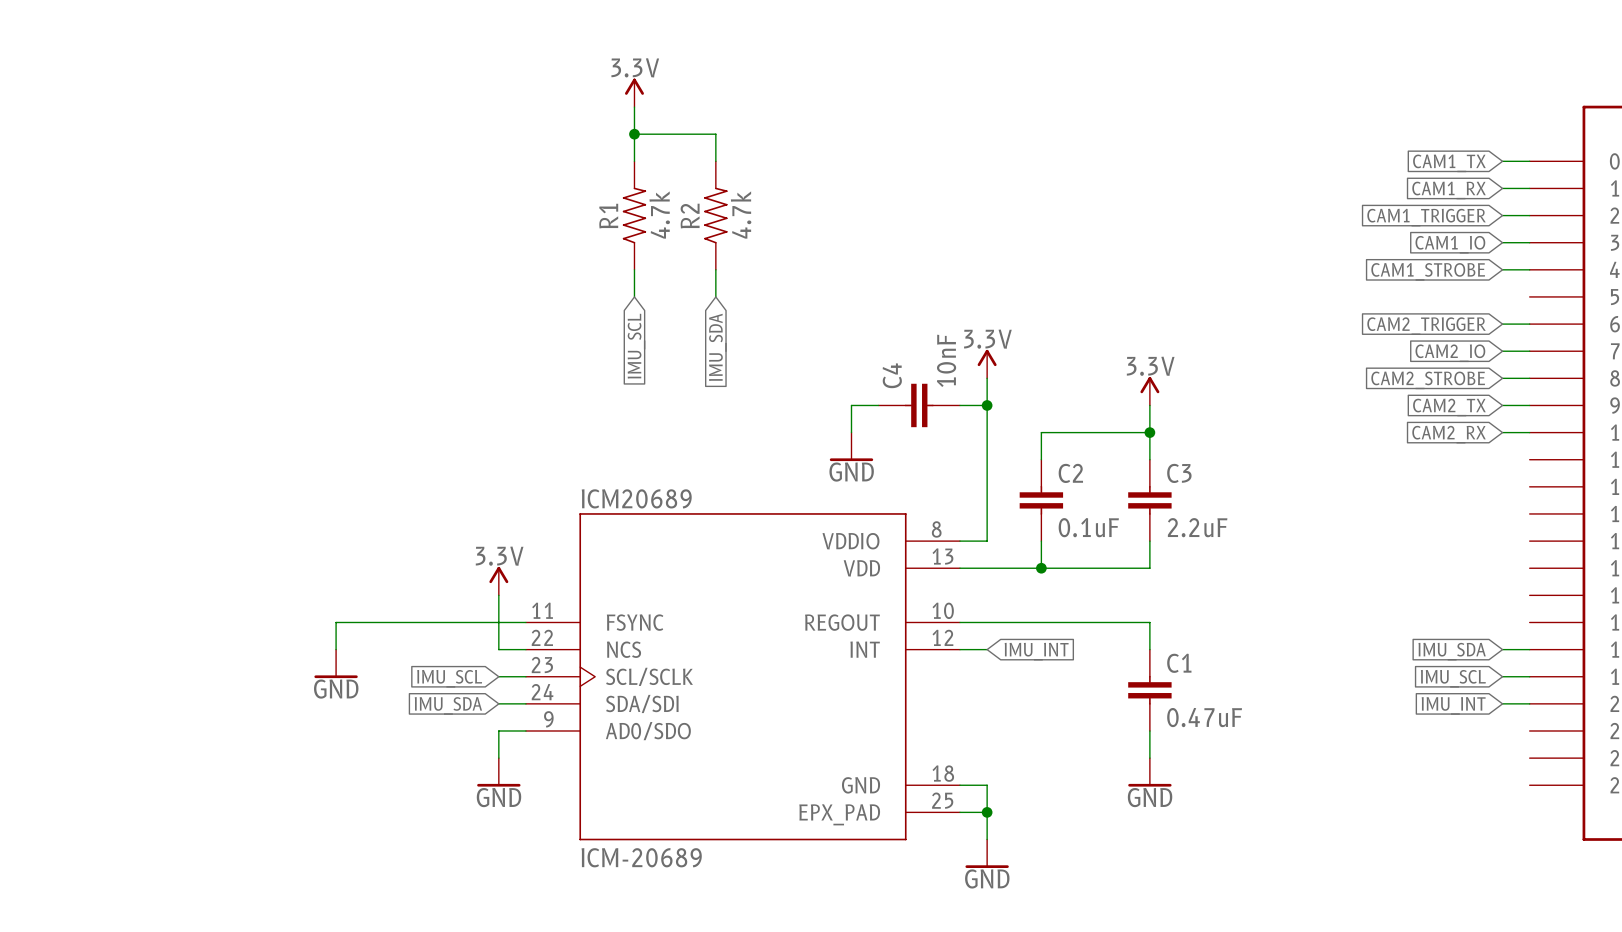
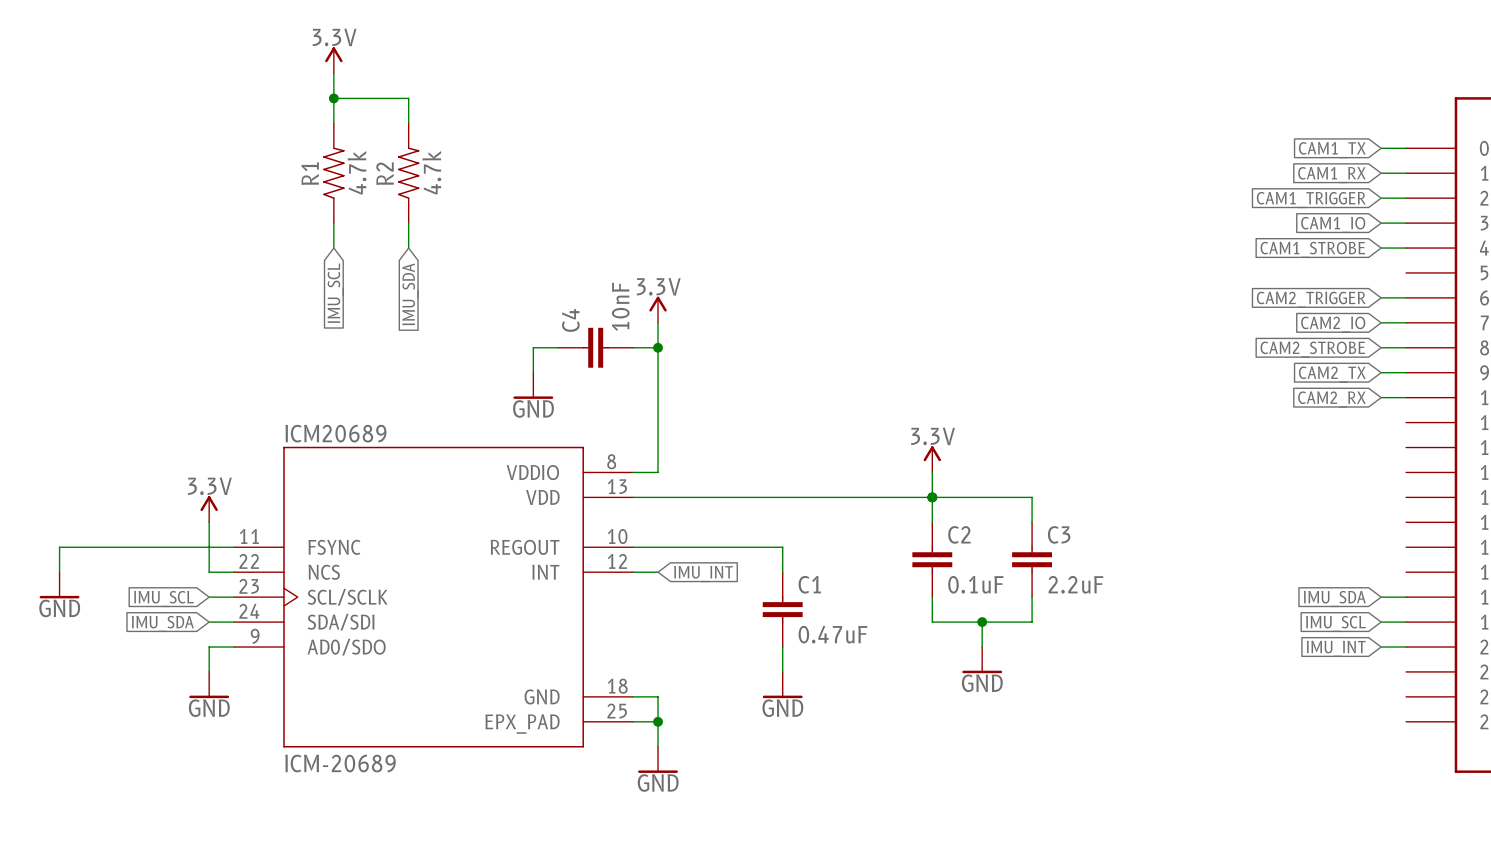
power symbol: none -> 3.3V (333, 60)
wire: none -> (333, 73) (333, 123)
power symbol: 3.3V (634, 92) -> none
wire: none -> (333, 98) (408, 98) (408, 123)
junction: none -> (333, 98)
wire: (634, 107) (634, 161) -> none
wire: (634, 134) (715, 134) (715, 161) -> none
junction: (634, 134) -> none
R1 position: (634, 215) -> (333, 173)
R2 position: (715, 215) -> (408, 173)
wire: none -> (333, 223) (333, 248)
wire: (634, 269) (634, 296) -> (408, 223) (408, 248)
wire: (715, 269) (715, 296) -> none
global label: none -> IMU_SCL (335, 293)
global label: none -> IMU_SDA (410, 294)
power symbol: none -> 3.3V (658, 309)
global label: IMU_SCL (636, 346) -> none
global label: IMU_SDA (717, 347) -> none
wire: none -> (658, 322) (658, 472) (633, 472)
power symbol: 3.3V (987, 364) -> none
wire: none -> (558, 347) (533, 347) (533, 372)
wire: none -> (633, 347) (658, 347)
junction: none -> (658, 347)
wire: (987, 378) (987, 541) -> (1032, 522) (1032, 497) (907, 497)
power symbol: 3.3V (1149, 391) -> none
wire: (878, 405) (851, 405) (851, 432) -> none
C4 position: (919, 405) -> (595, 347)
wire: (960, 405) (987, 405) -> none
junction: (987, 405) -> none
wire: (1149, 405) (1149, 459) -> (932, 472) (932, 522)
power symbol: none -> GND (533, 385)
wire: (1149, 432) (1041, 432) (1041, 459) -> none
junction: (1149, 432) -> none
power symbol: GND (851, 446) -> none
power symbol: none -> 3.3V (932, 459)
C2 position: (1041, 500) -> (932, 559)
C3 position: (1149, 500) -> (1032, 559)
wire: none -> (633, 497) (882, 497)
wire: (1041, 541) (1041, 568) -> (782, 647) (782, 671)
wire: (1149, 541) (1149, 568) (960, 568) -> none
power symbol: none -> 3.3V (209, 509)
wire: none -> (209, 522) (209, 572) (234, 572)
junction position: (1041, 568) -> (932, 497)
power symbol: 3.3V (498, 581) -> none
wire: none -> (234, 547) (59, 547) (59, 572)
wire: (498, 595) (498, 649) (525, 649) -> none
wire: none -> (633, 547) (782, 547) (782, 572)
wire: (525, 622) (336, 622) (336, 649) -> none
wire: (960, 622) (1149, 622) (1149, 649) -> none
global label: none -> IMU_INT (703, 574)
power symbol: none -> GND (59, 585)
wire: none -> (209, 597) (234, 597)
wire: (960, 649) (987, 649) -> none
wire: none -> (932, 597) (932, 622) (1032, 622) (1032, 597)
global label: none -> IMU_SCL (163, 599)
global label: IMU_INT (1036, 651) -> none
power symbol position: GND (336, 663) -> GND (209, 685)
wire: none -> (209, 622) (234, 622)
wire: (498, 676) (525, 676) -> (633, 572) (658, 572)
ICM20689 position: (742, 676) -> (433, 597)
junction: none -> (982, 622)
global label: none -> IMU_SDA (162, 623)
global label: IMU_SCL (449, 678) -> none
C1 position: (1149, 690) -> (782, 609)
wire: none -> (234, 647) (209, 647) (209, 671)
wire: (498, 703) (525, 703) -> (633, 721) (658, 721)
global label: IMU_SDA (448, 705) -> none
power symbol: none -> GND (982, 660)
wire: (525, 730) (498, 730) (498, 758) -> none
wire: (1149, 730) (1149, 758) -> (982, 622) (982, 647)
power symbol: none -> GND (782, 685)
wire: none -> (633, 696) (658, 696) (658, 746)
power symbol: GND (498, 772) -> none
power symbol: GND (1149, 772) -> none
junction: none -> (658, 721)
wire: (960, 785) (987, 785) (987, 839) -> none
wire: (960, 812) (987, 812) -> none
junction: (987, 812) -> none
power symbol: none -> GND (658, 759)
power symbol: GND (987, 853) -> none

